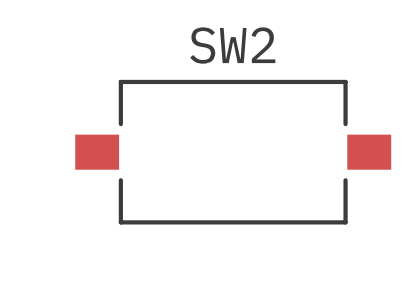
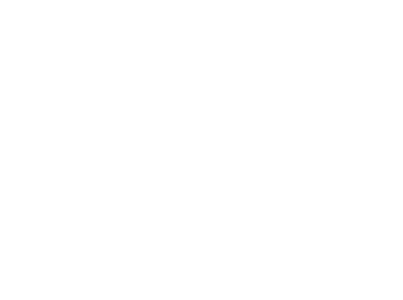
SW2: (233, 152) -> none

